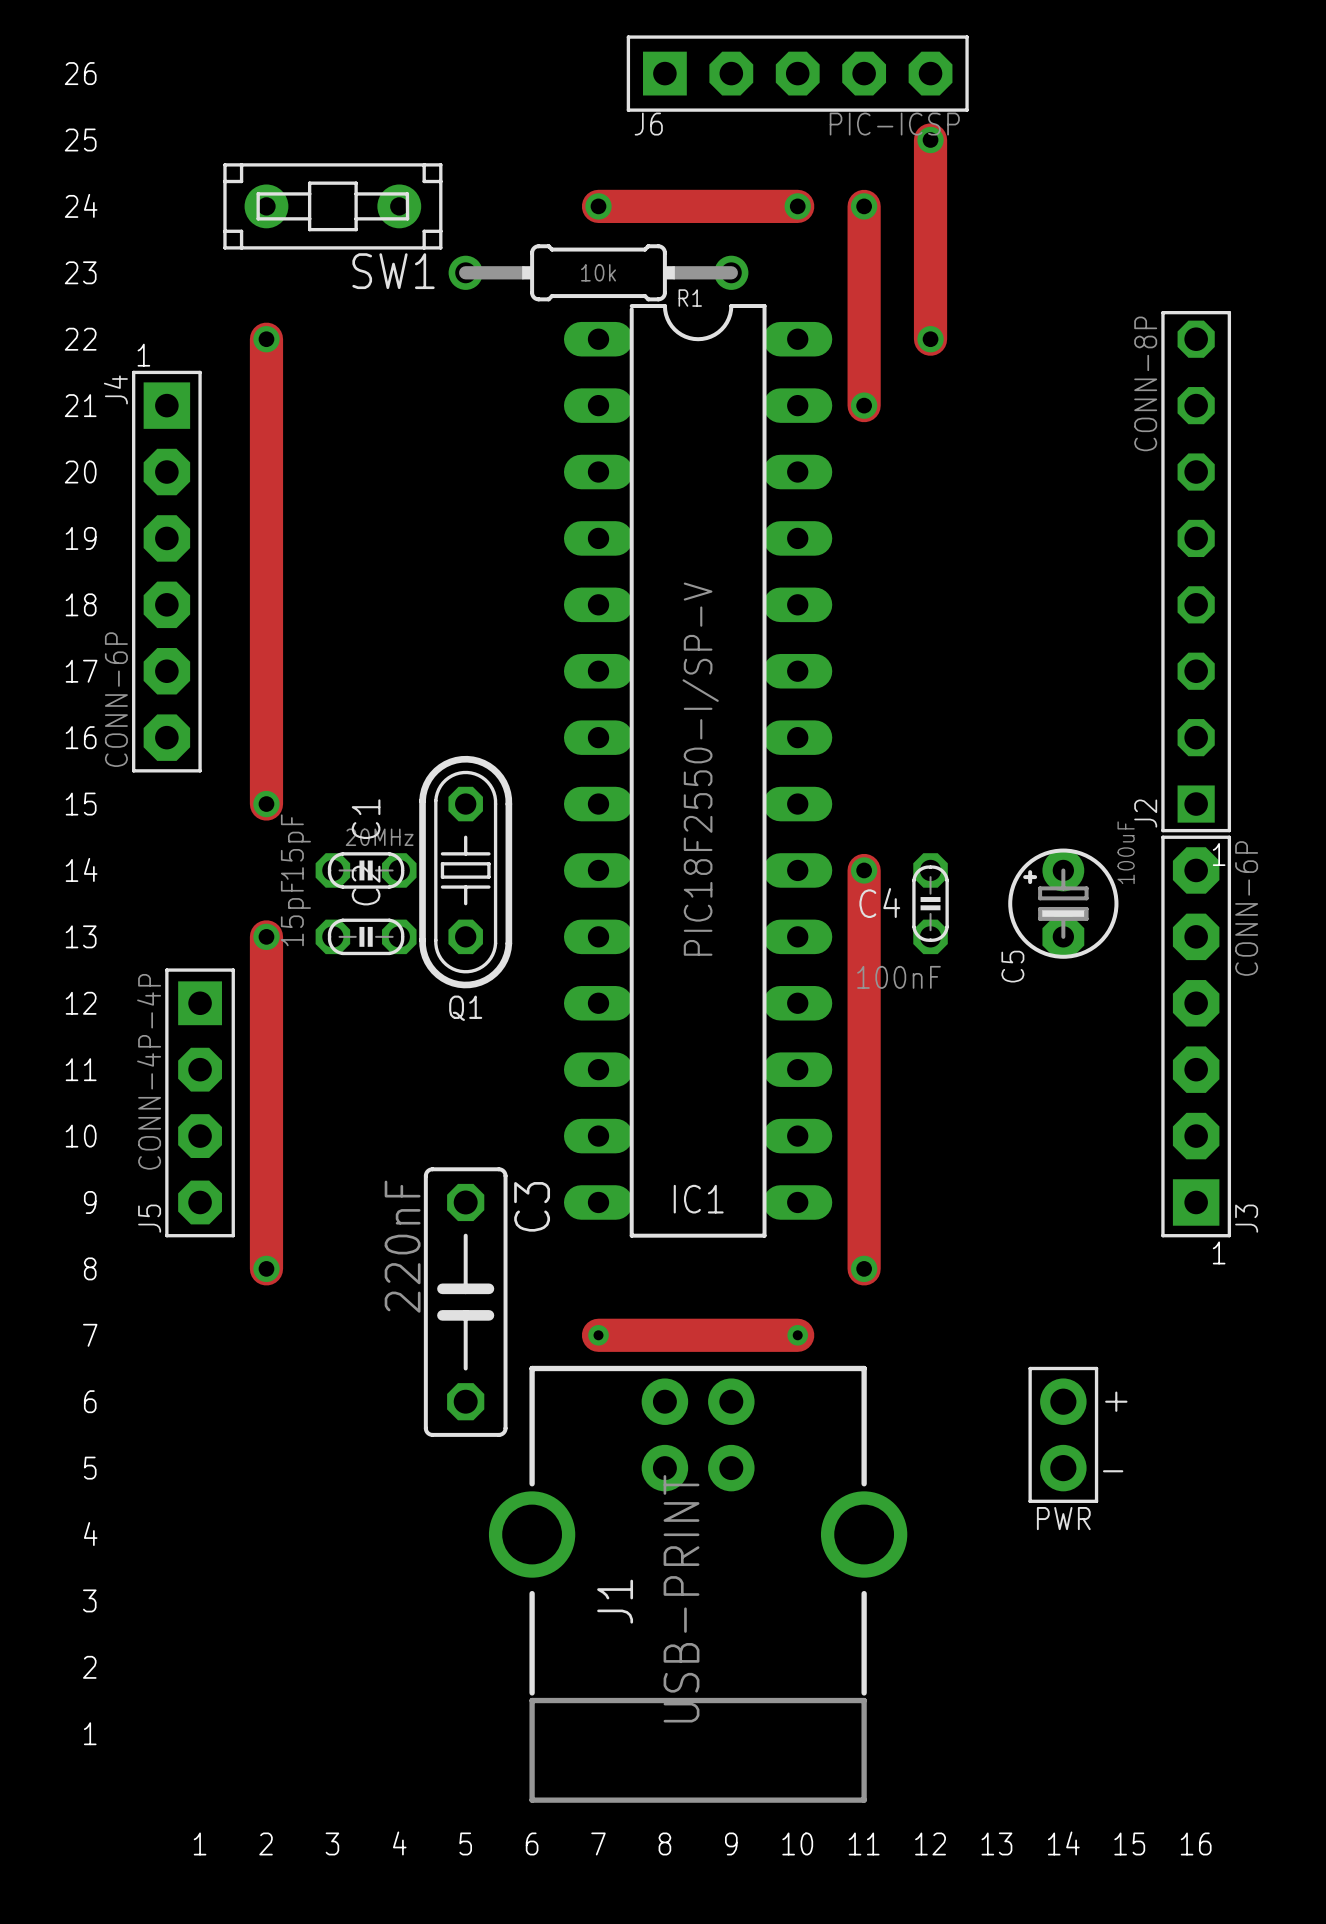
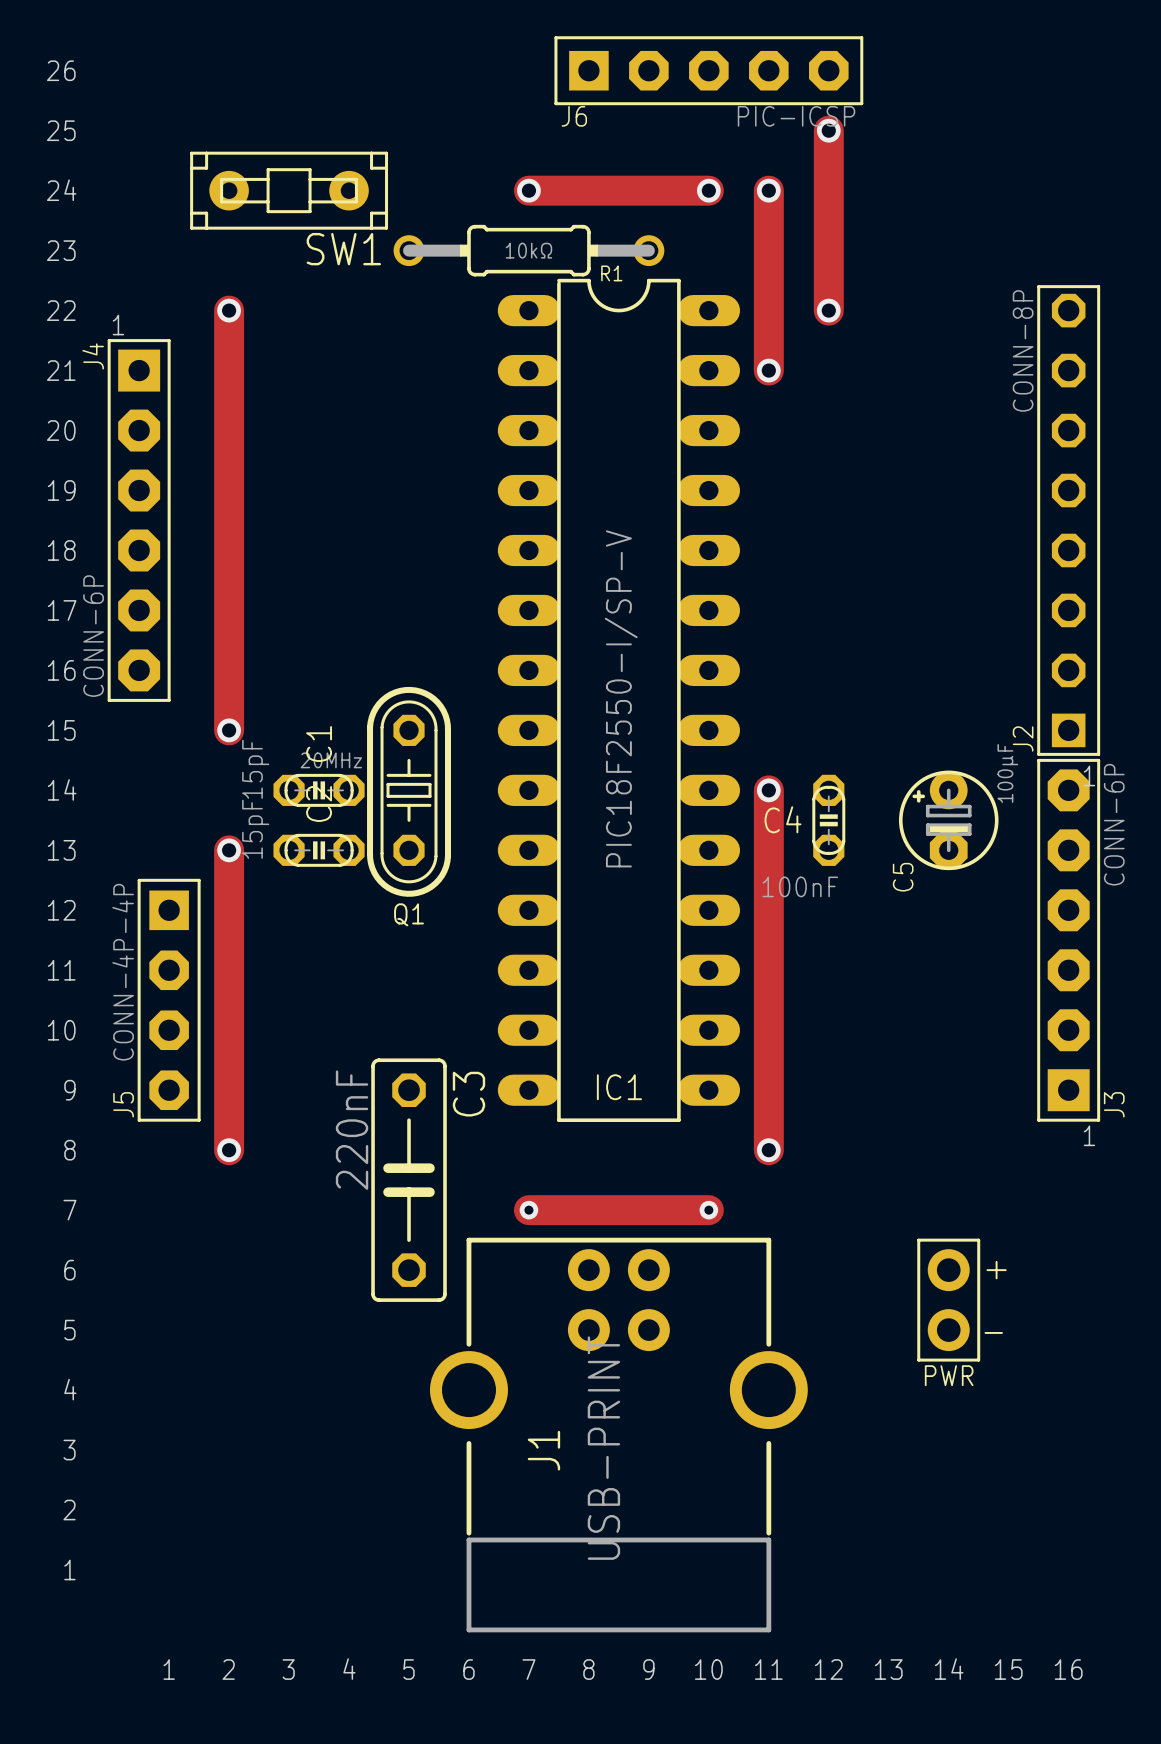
R1 value: 10k (598, 272) -> 10kΩ (528, 250)
C5 value: 100uF (1126, 852) -> 100μF (1007, 773)

